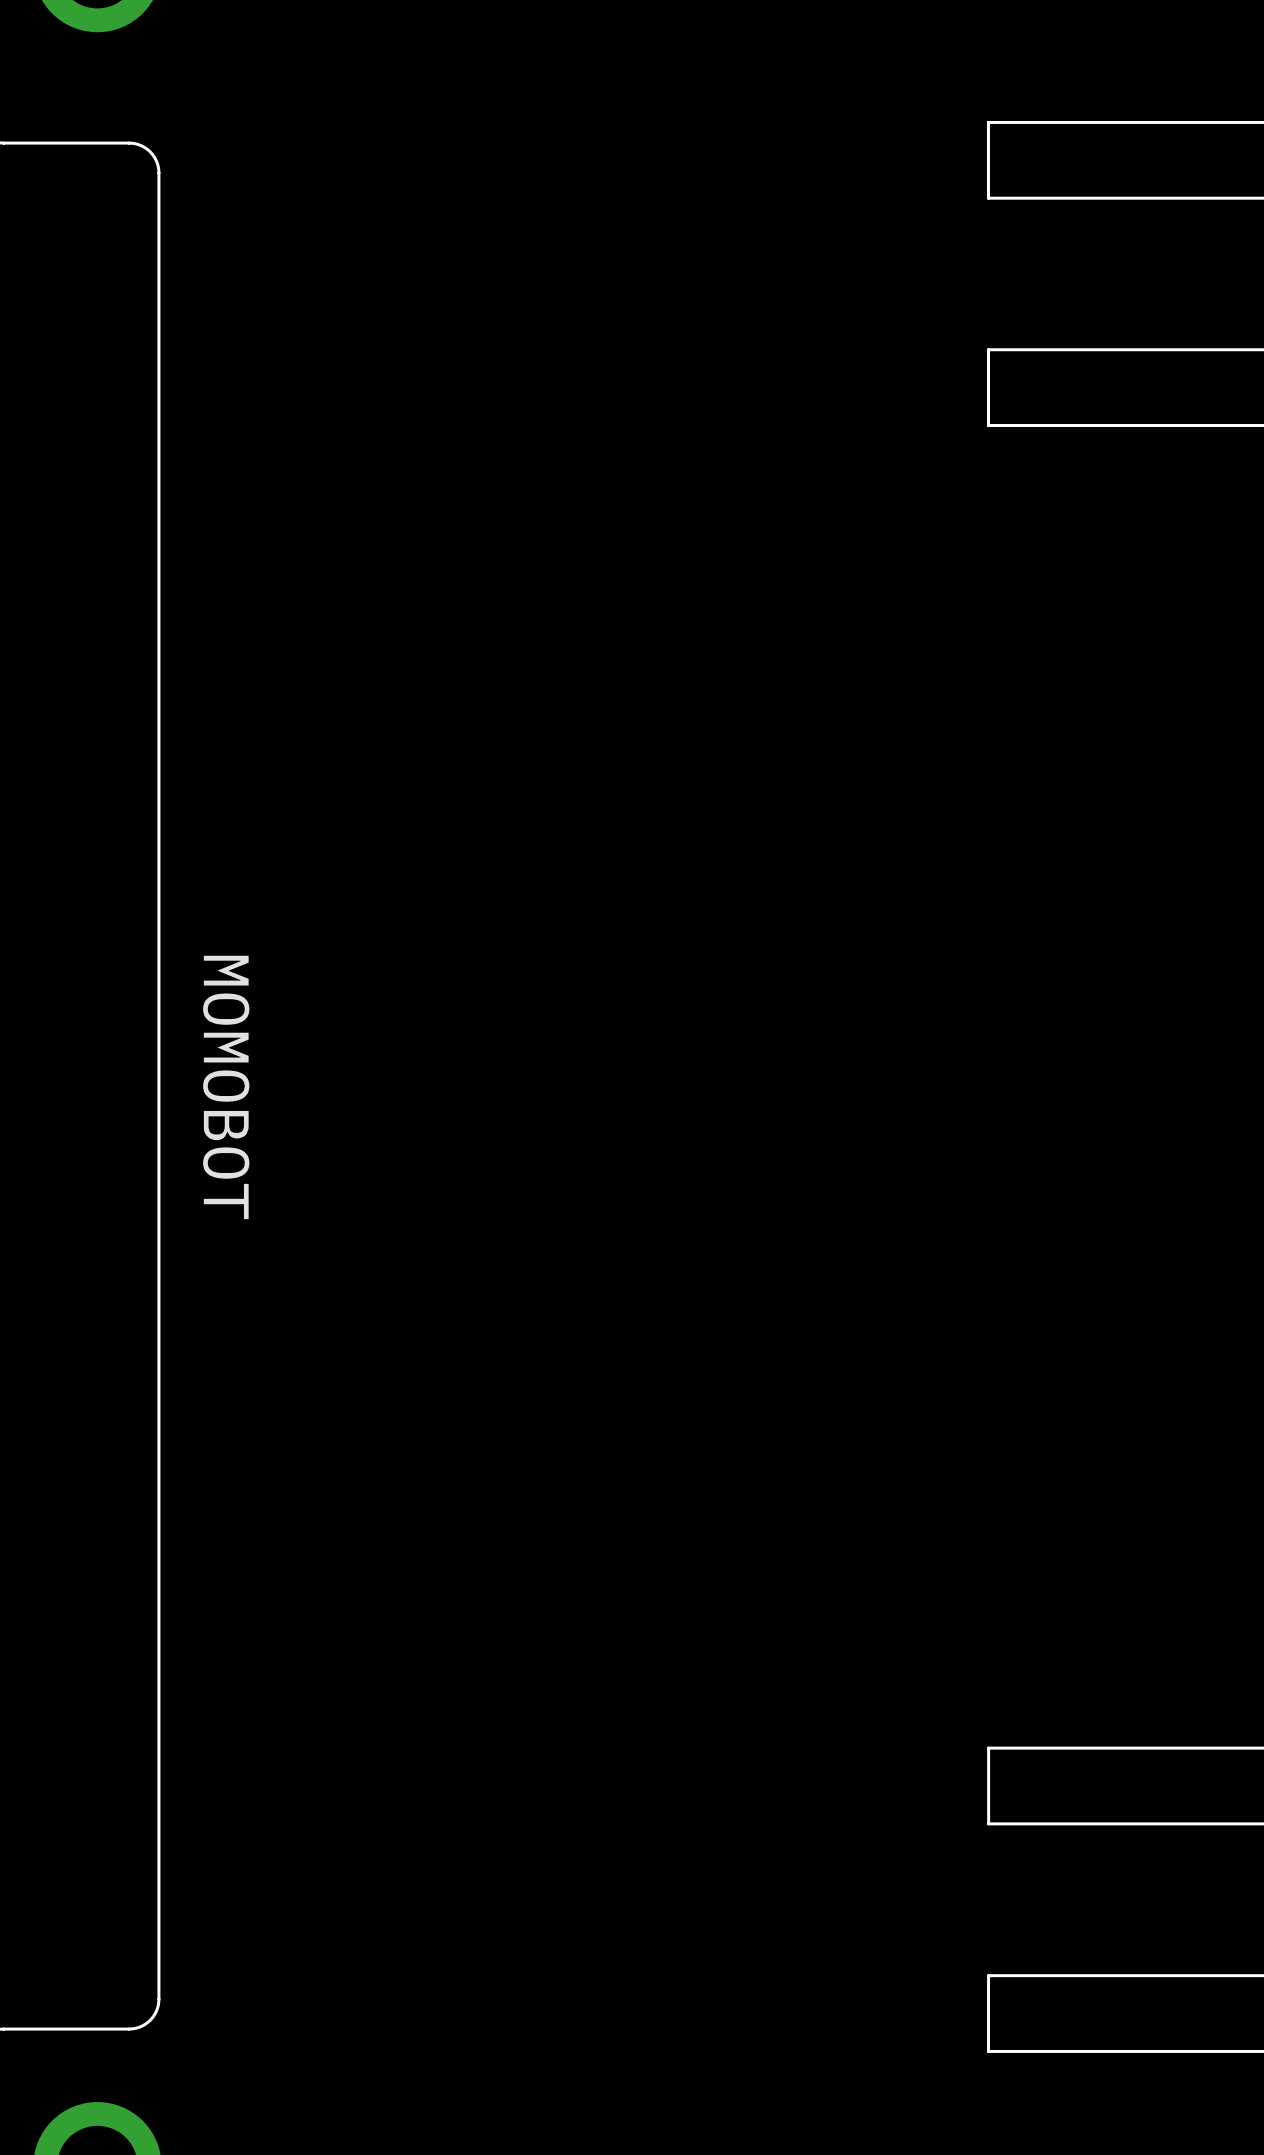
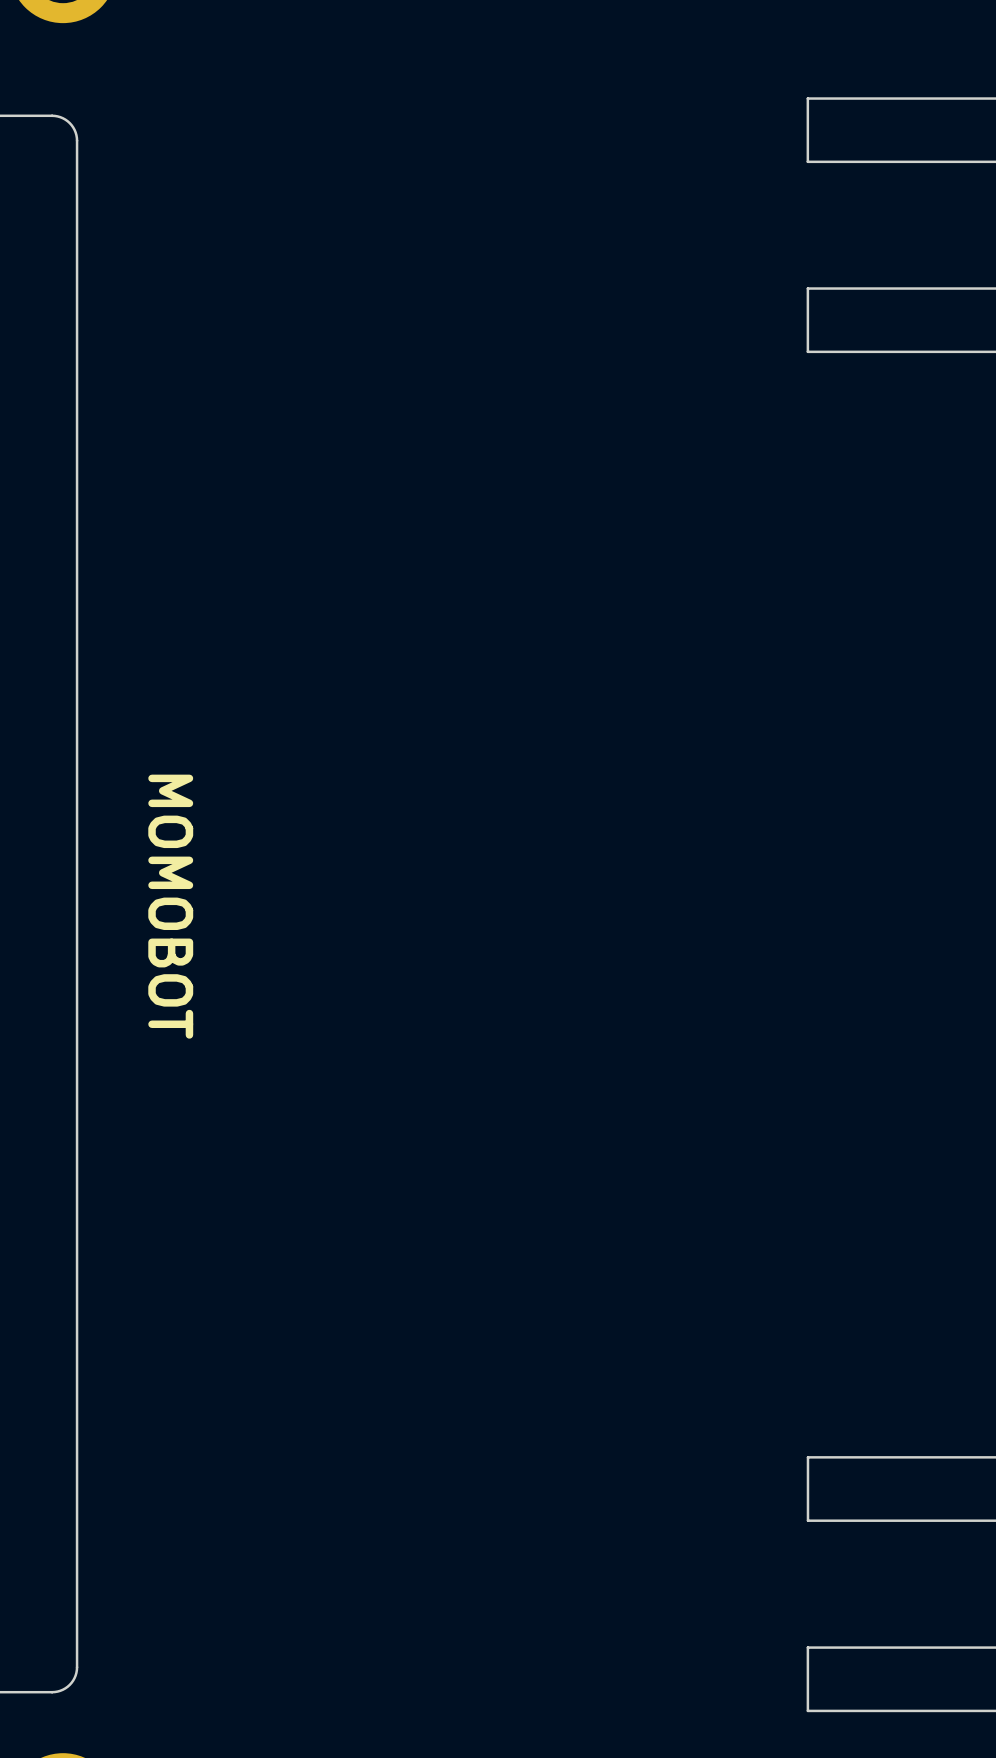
board edge: (84, 143) (138, 144) (147, 149) (154, 157) (158, 172) (158, 1999) (154, 2015) (147, 2022) (138, 2027) (84, 2029) -> (52, 115) (62, 118) (69, 123) (75, 132) (77, 140) (77, 1667) (74, 1678) (69, 1684) (60, 1690) (52, 1692)

